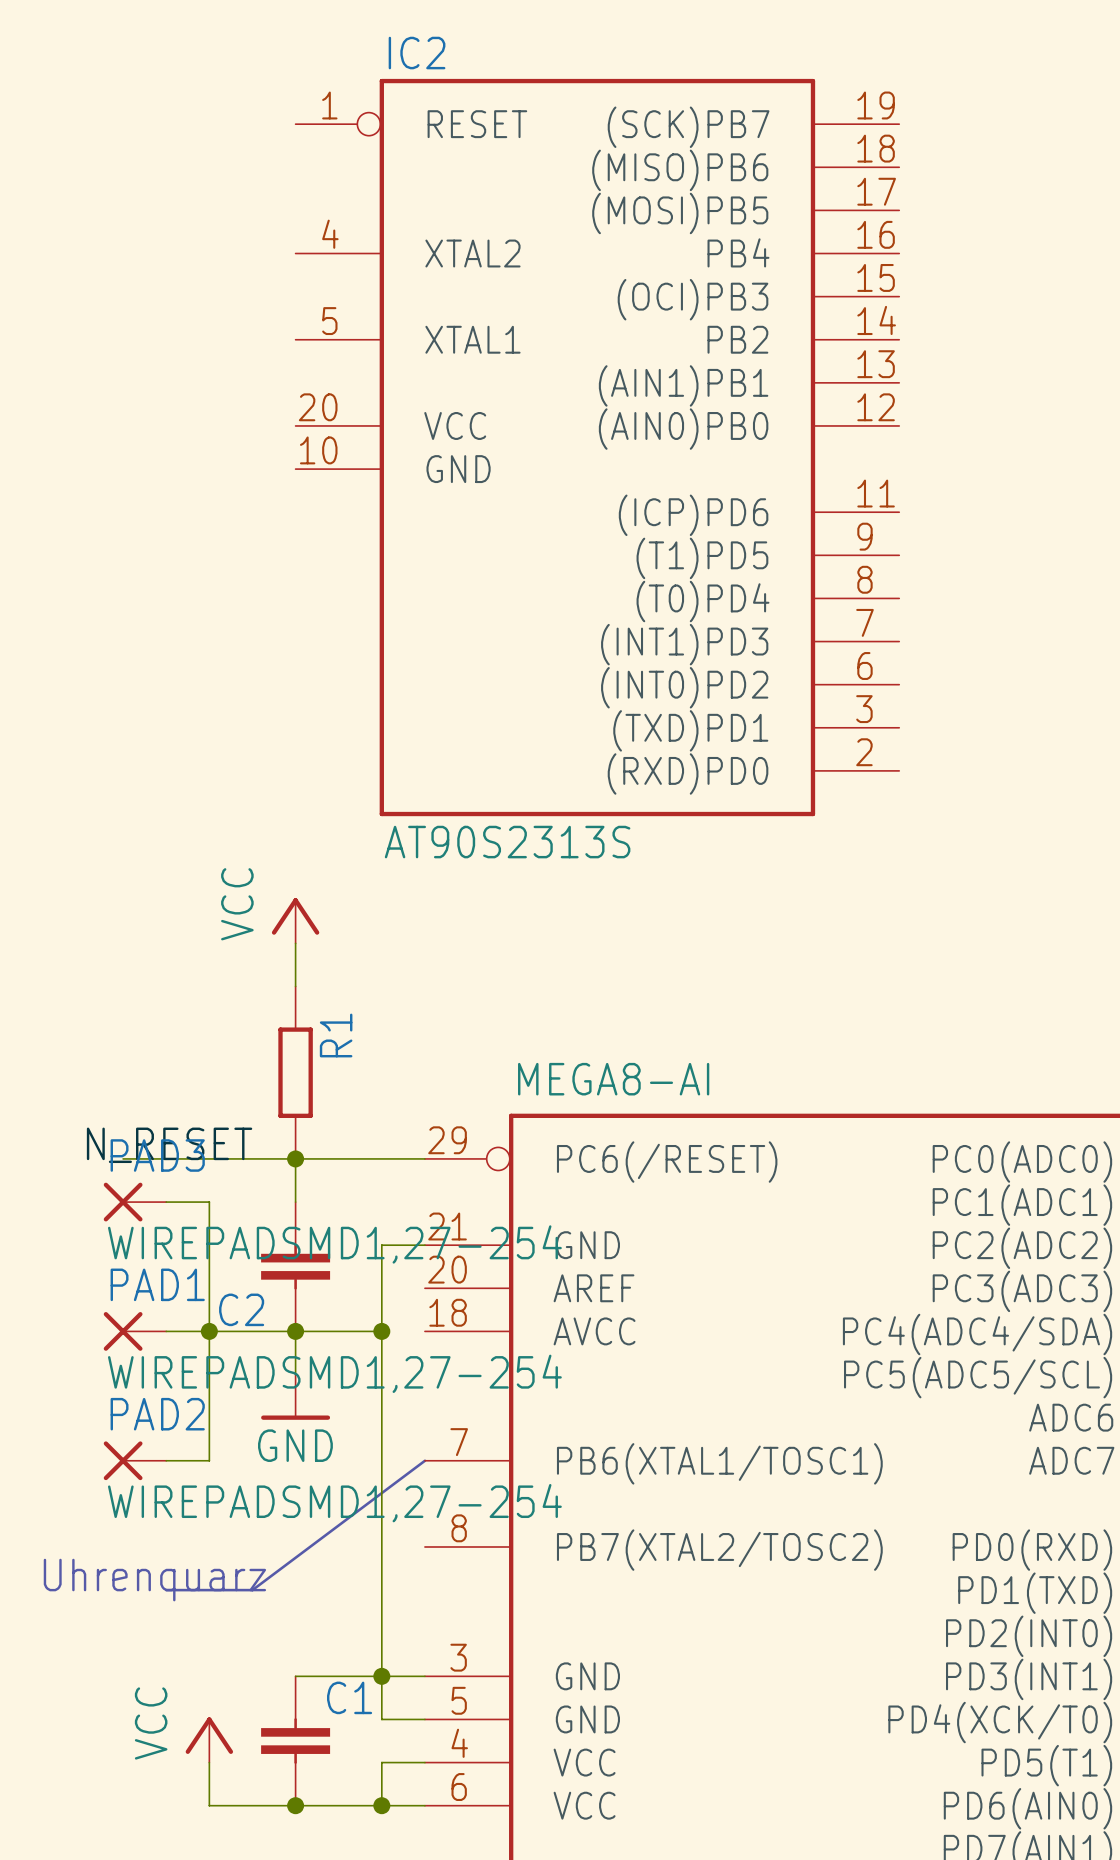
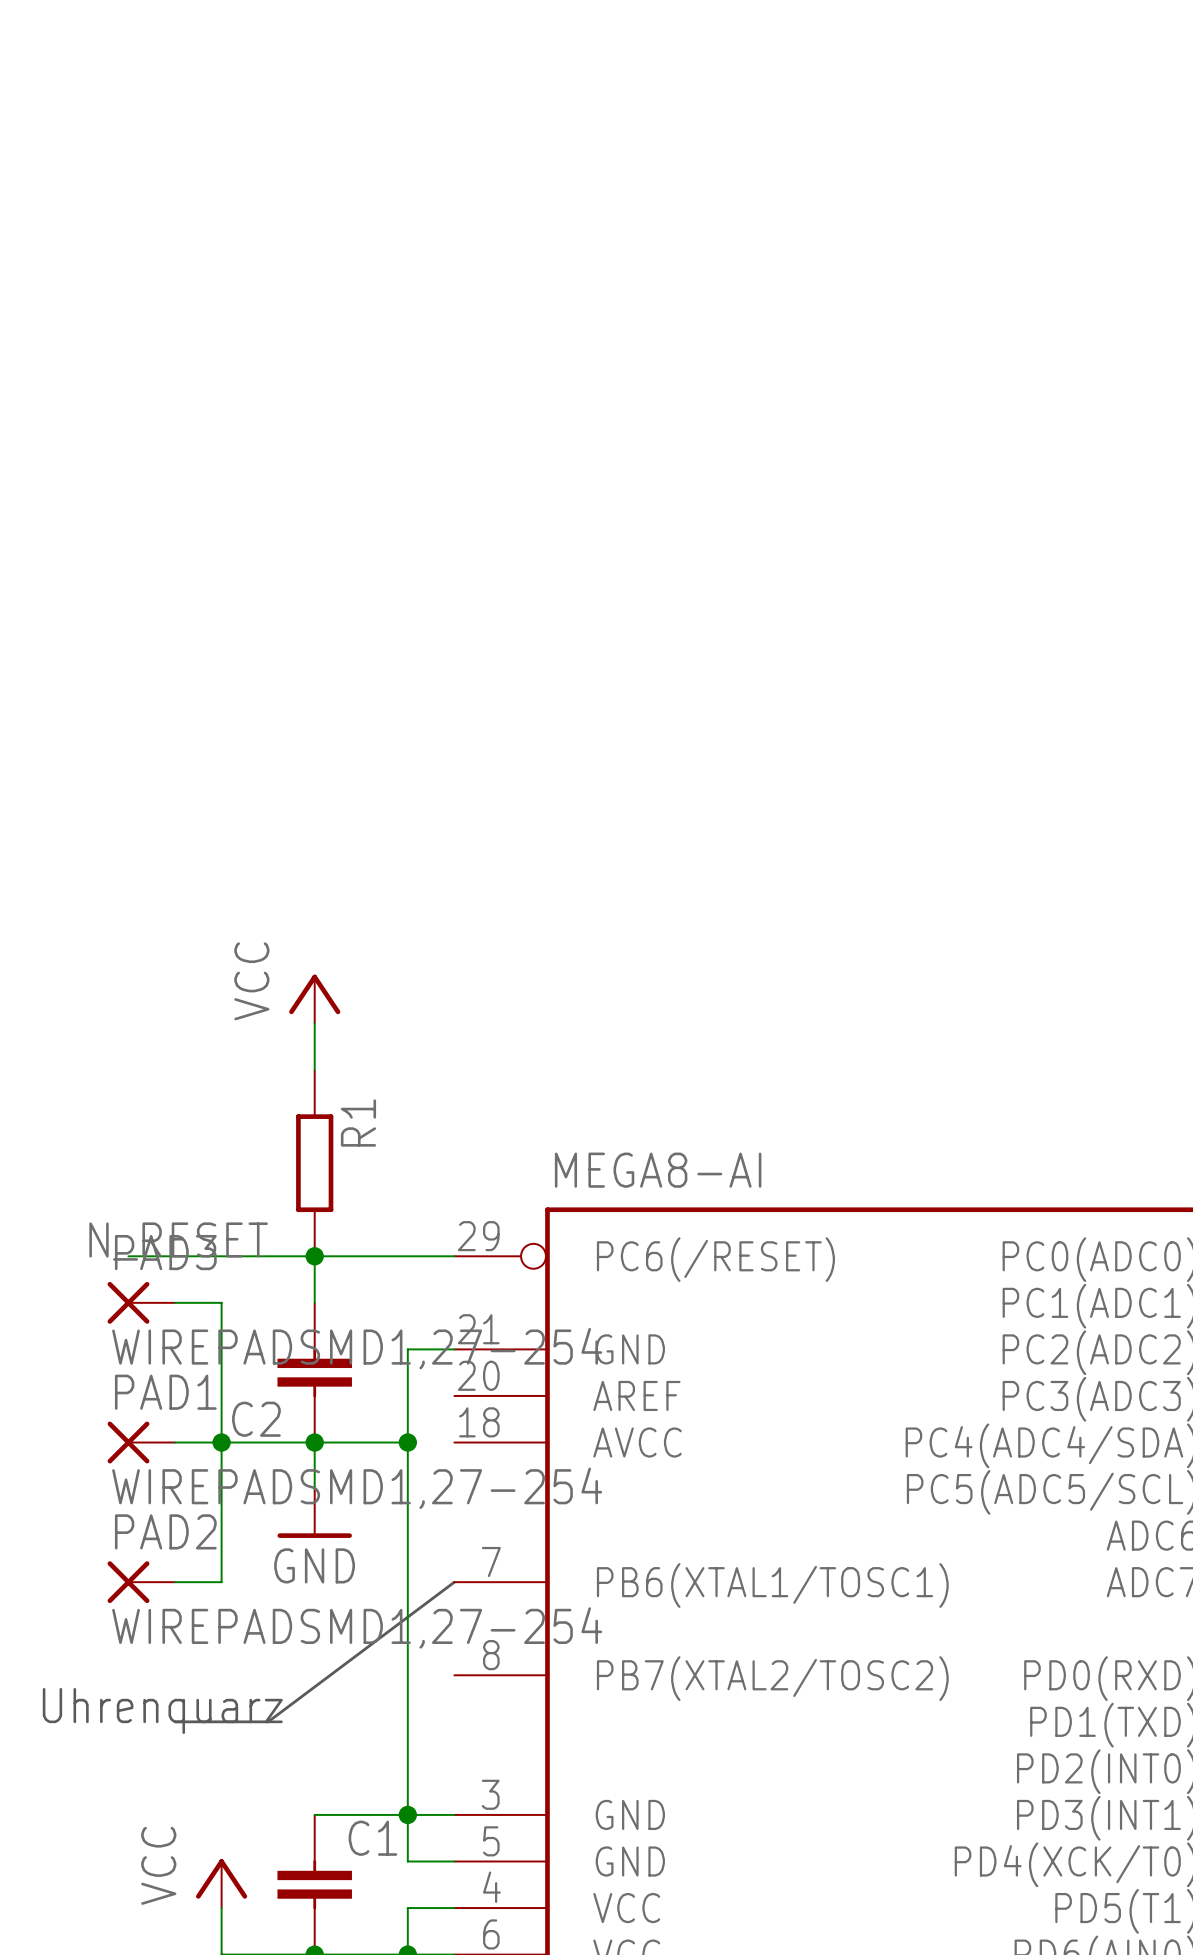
IC2: AT90S2313S (597, 447) -> none

